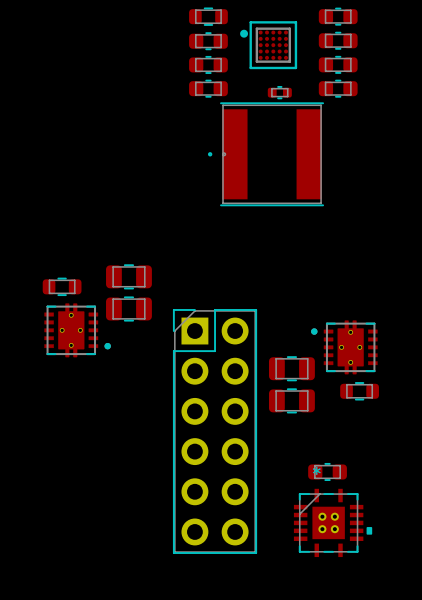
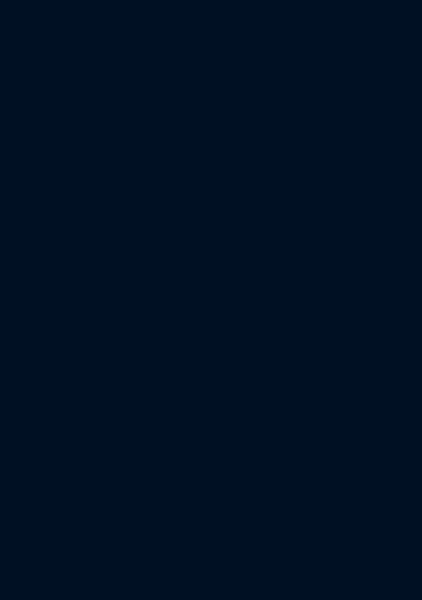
part: (208, 16) -> none
part: (338, 16) -> none
part: (338, 40) -> none
part: (208, 41) -> none
part: (268, 45) -> none
part: (208, 64) -> none
part: (338, 64) -> none
part: (208, 88) -> none
part: (338, 88) -> none
part: (279, 92) -> none
part: (266, 154) -> none
part: (128, 276) -> none
part: (62, 286) -> none
part: (128, 308) -> none
part: (77, 330) -> none
part: (344, 347) -> none
part: (291, 368) -> none
part: (359, 391) -> none
part: (291, 400) -> none
part: (215, 431) -> none
part: (327, 471) -> none
part: (333, 522) -> none

